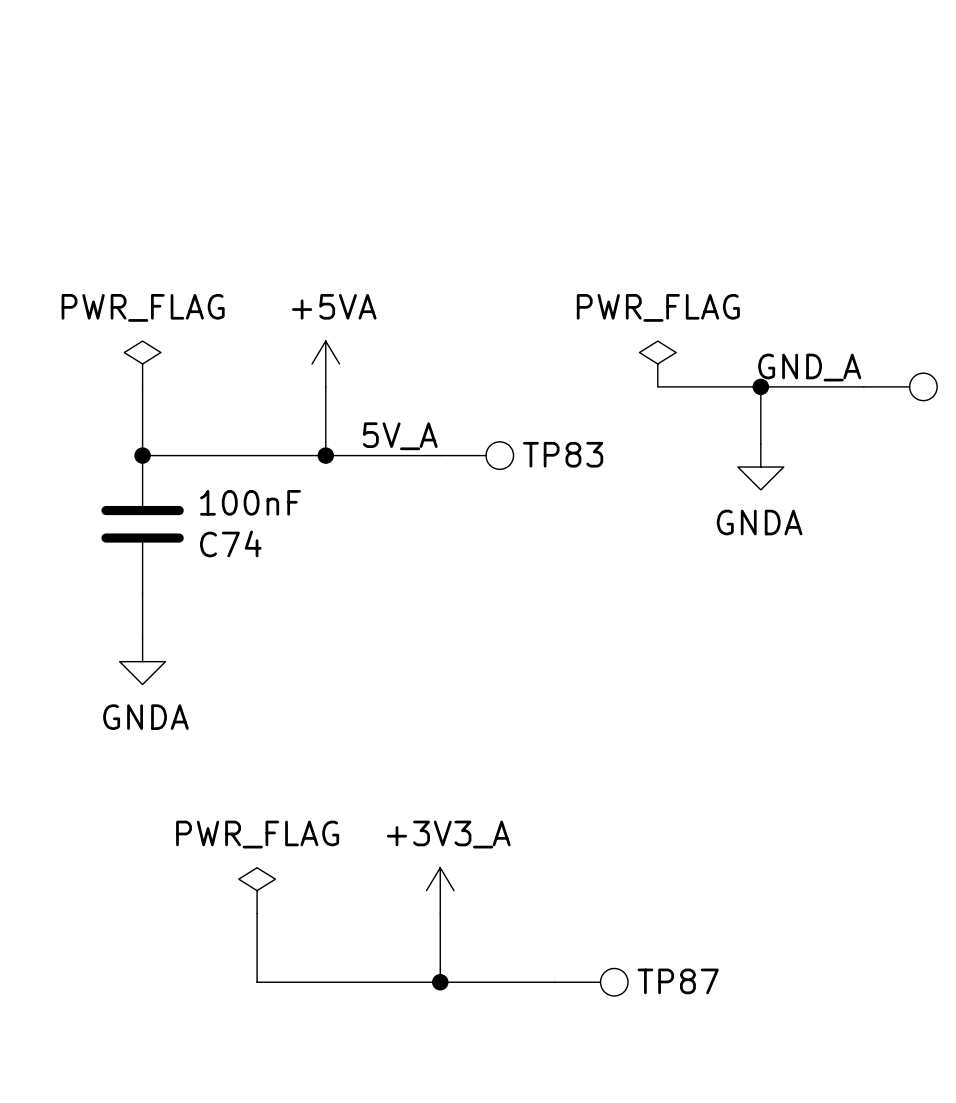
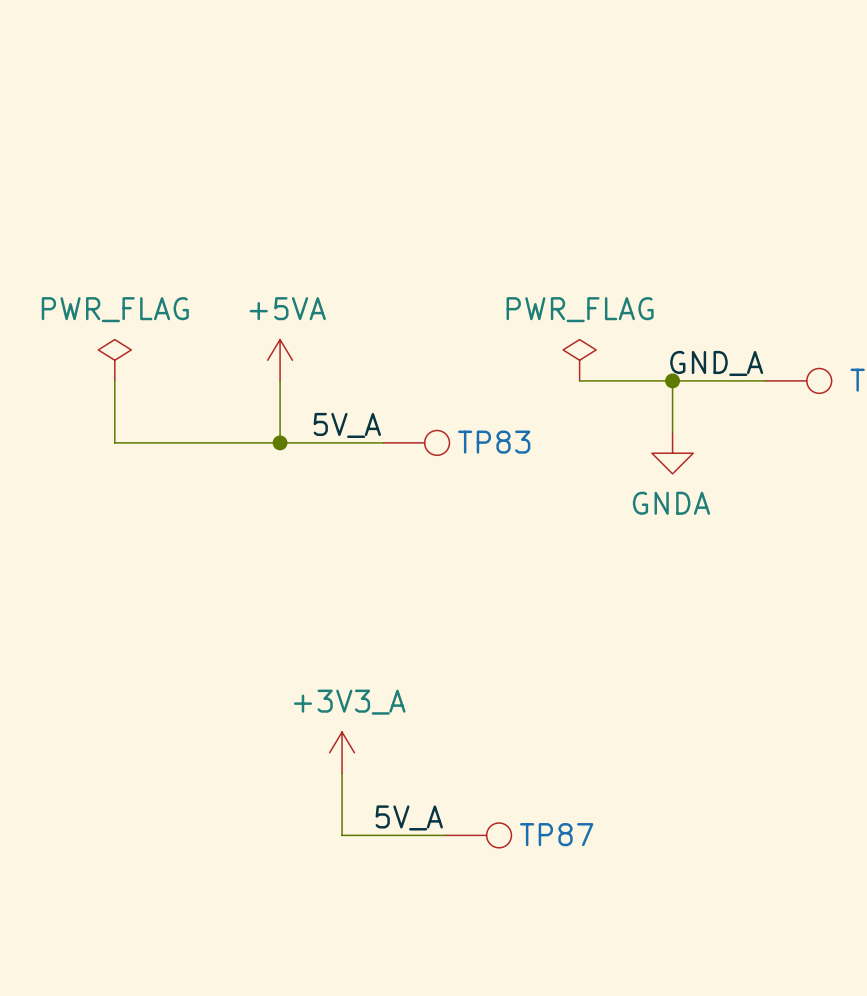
junction: (142, 455) -> none
C74: 100nF (142, 524) -> none
wire: (142, 592) (142, 638) -> none
power symbol: GNDA (142, 661) -> none
wire: none -> (342, 773) (342, 835) (445, 835)
label: none -> 5V_A (409, 817)
power symbol: PWR_FLAG (257, 890) -> none
power symbol position: +3V3_A (440, 890) -> +3V3_A (342, 752)
wire: (257, 913) (257, 982) (554, 982) -> none
wire: (440, 913) (440, 982) -> none
junction: (440, 982) -> none
TP87 position: (591, 982) -> (478, 835)

